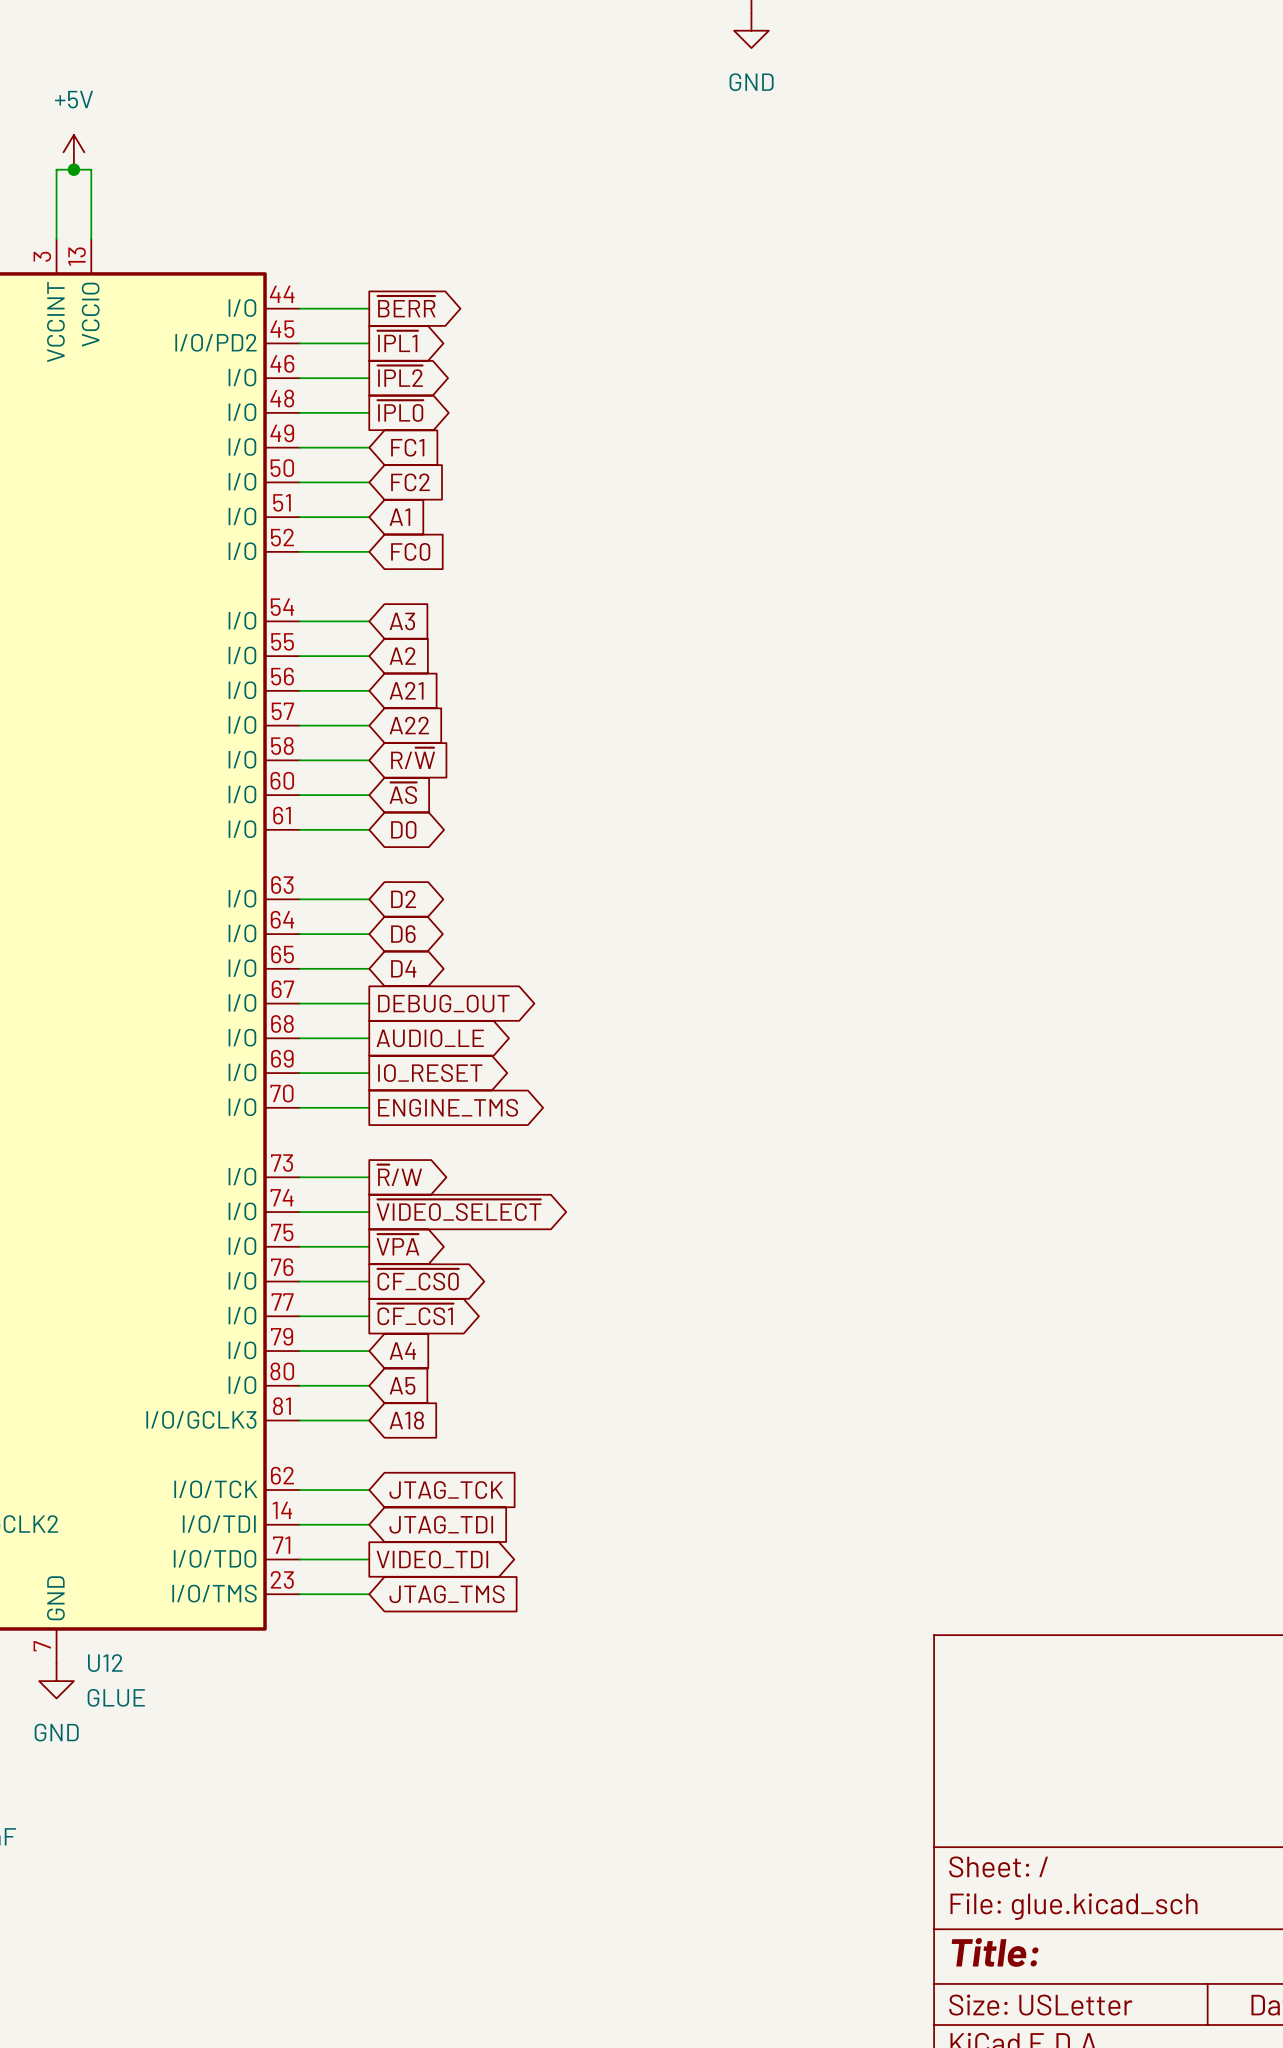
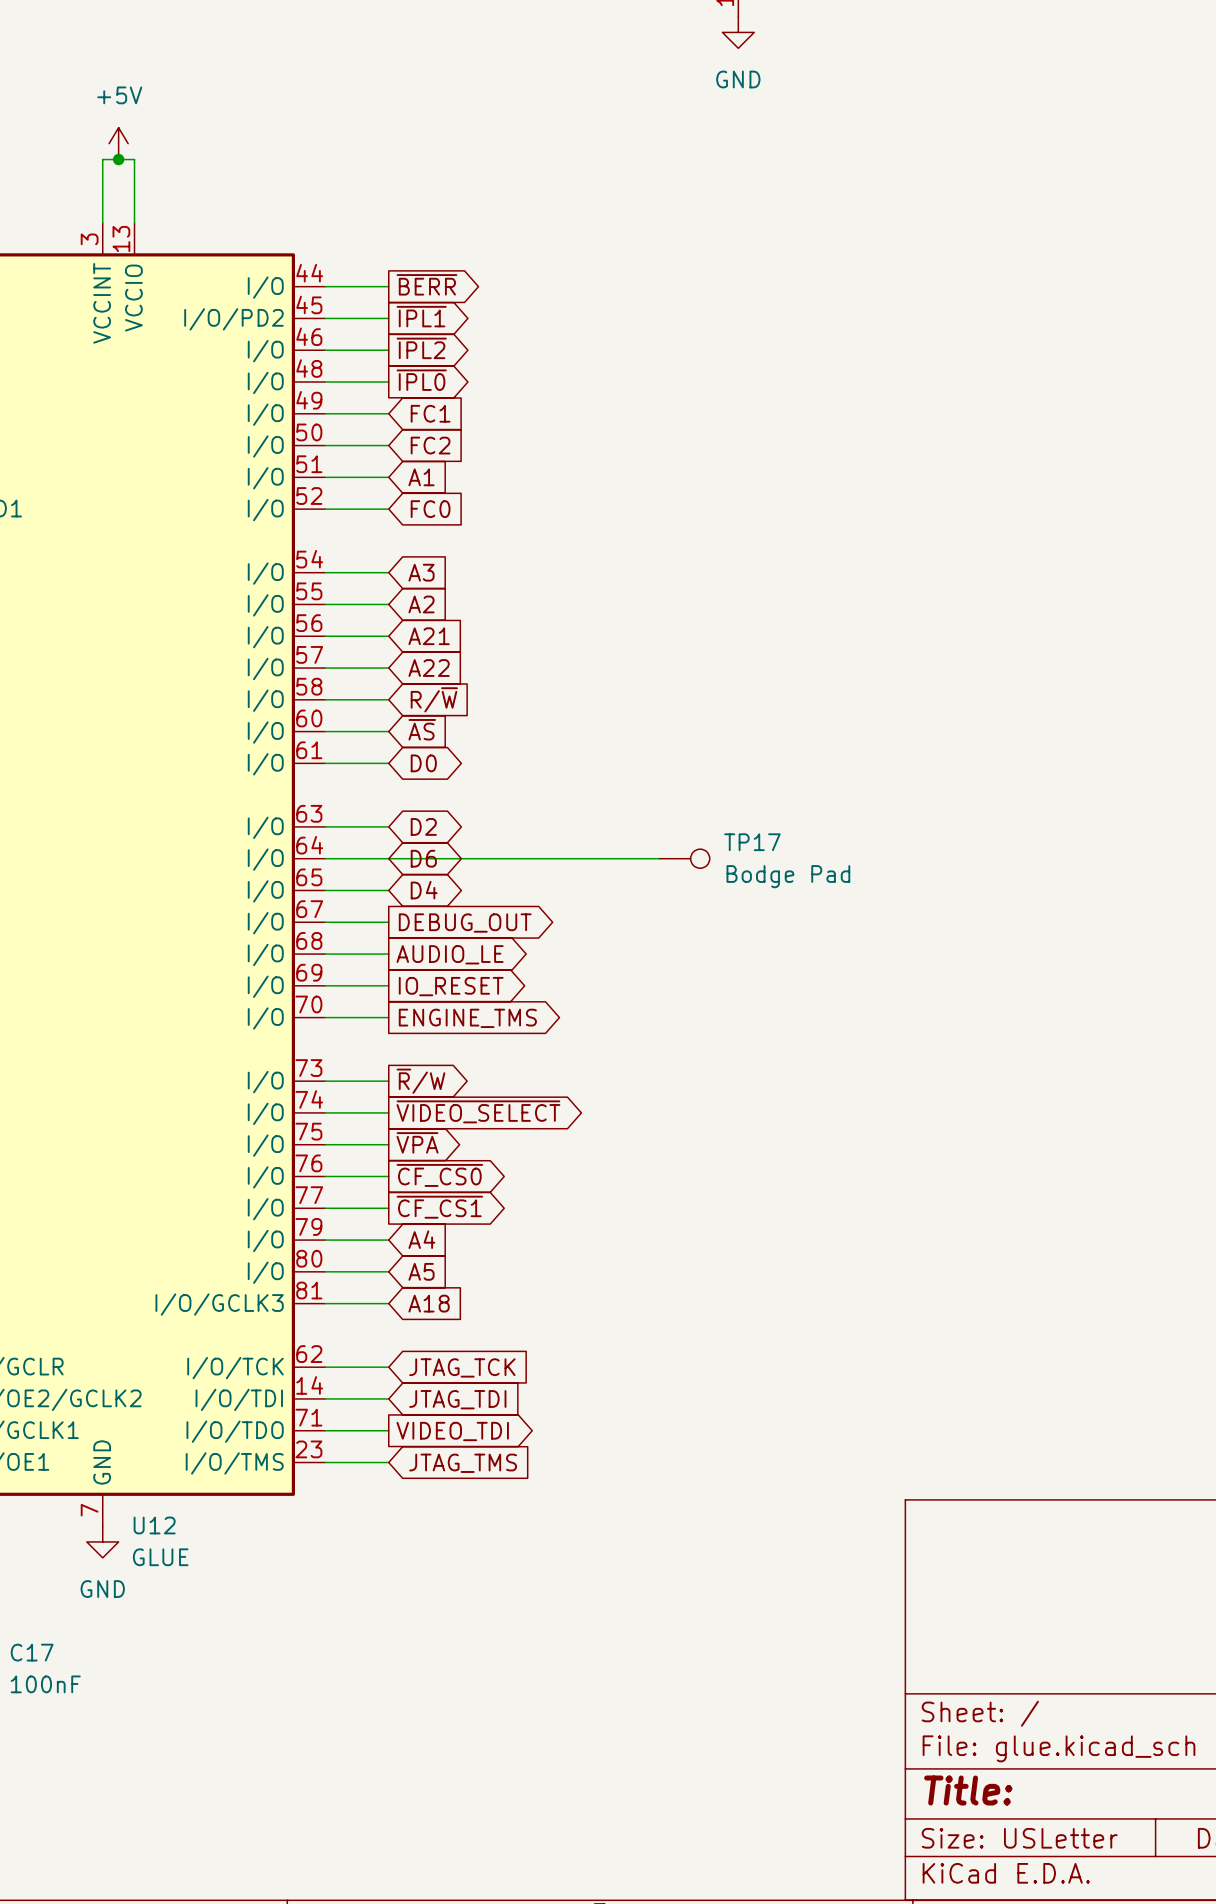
wire: none -> (388, 858) (658, 858)
TP17: none -> Bodge Pad (684, 858)

